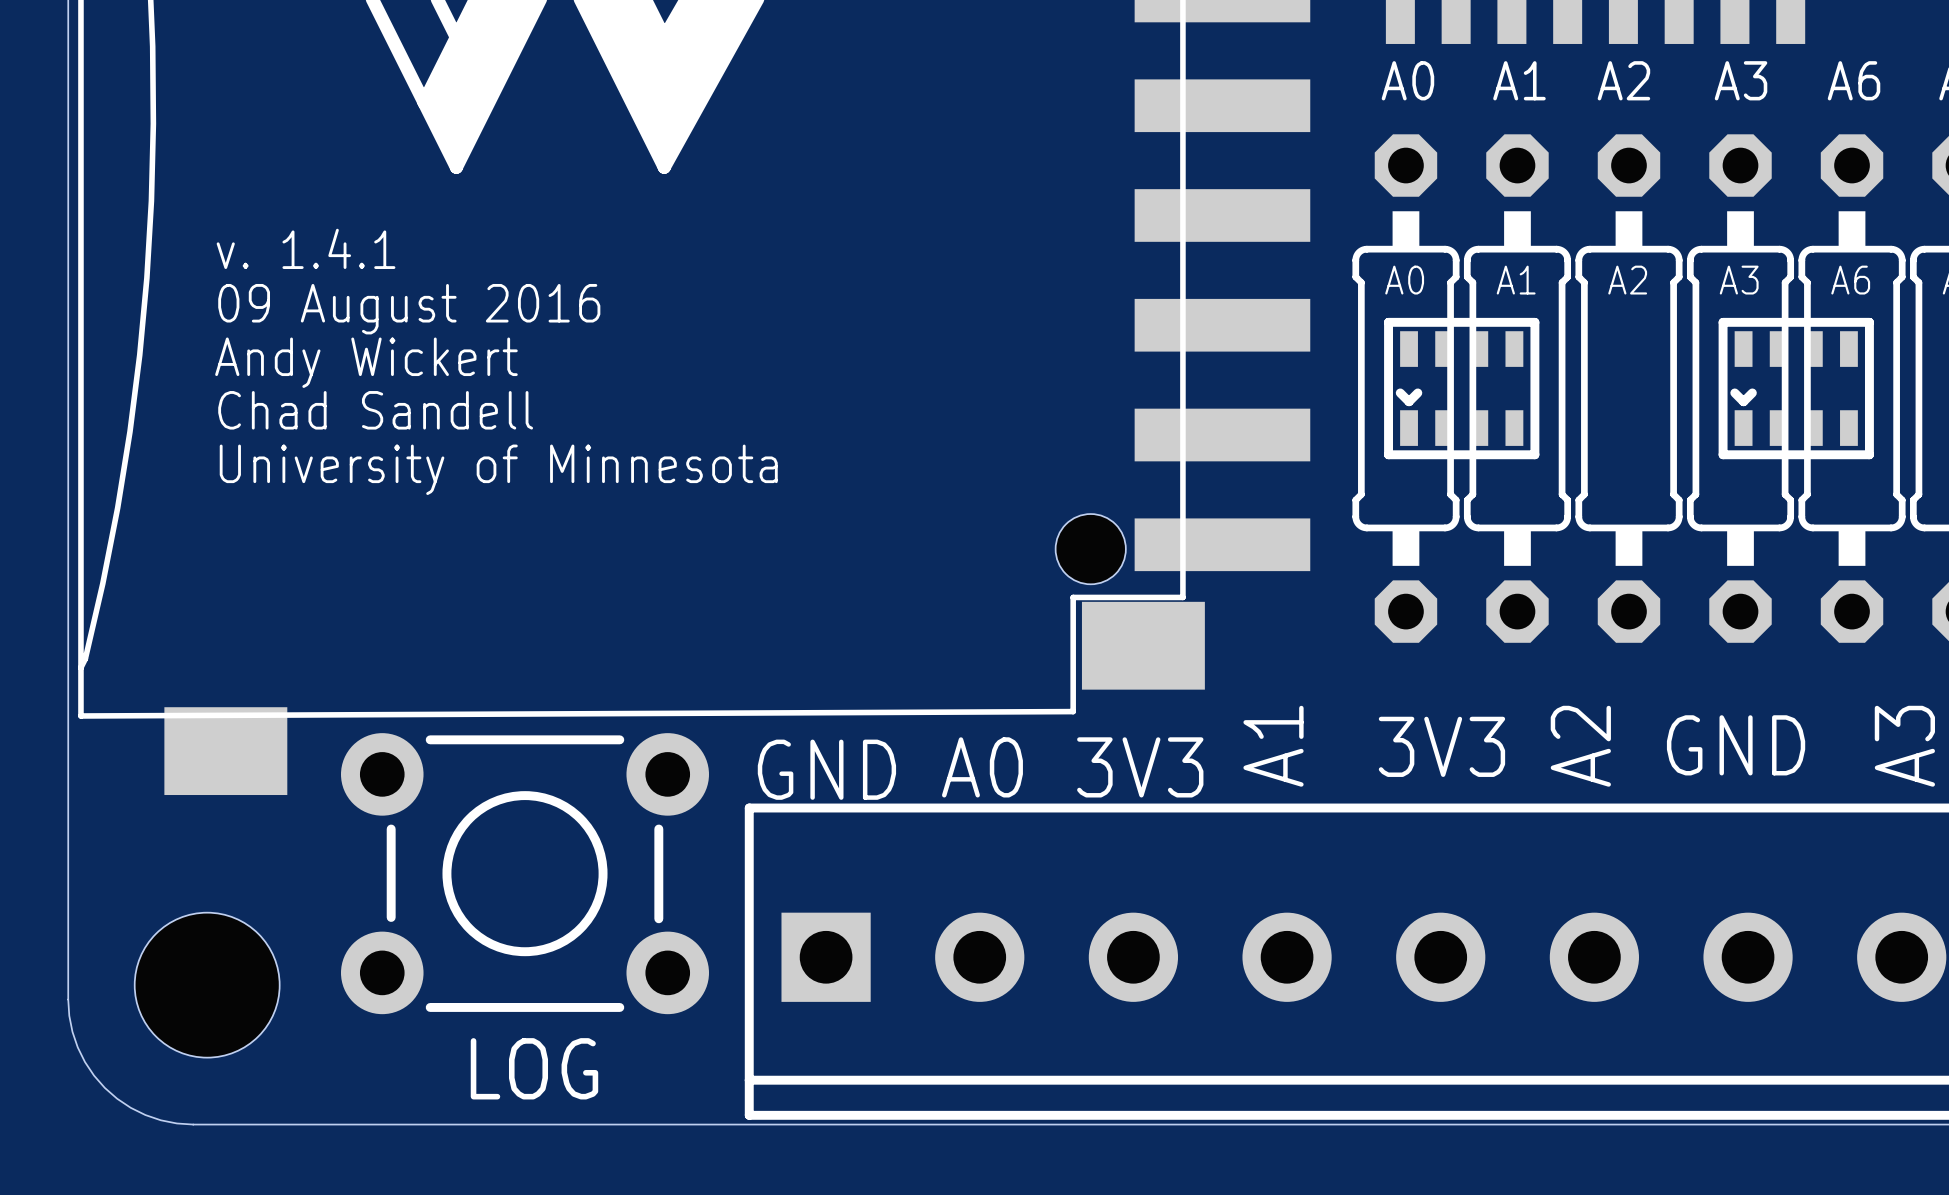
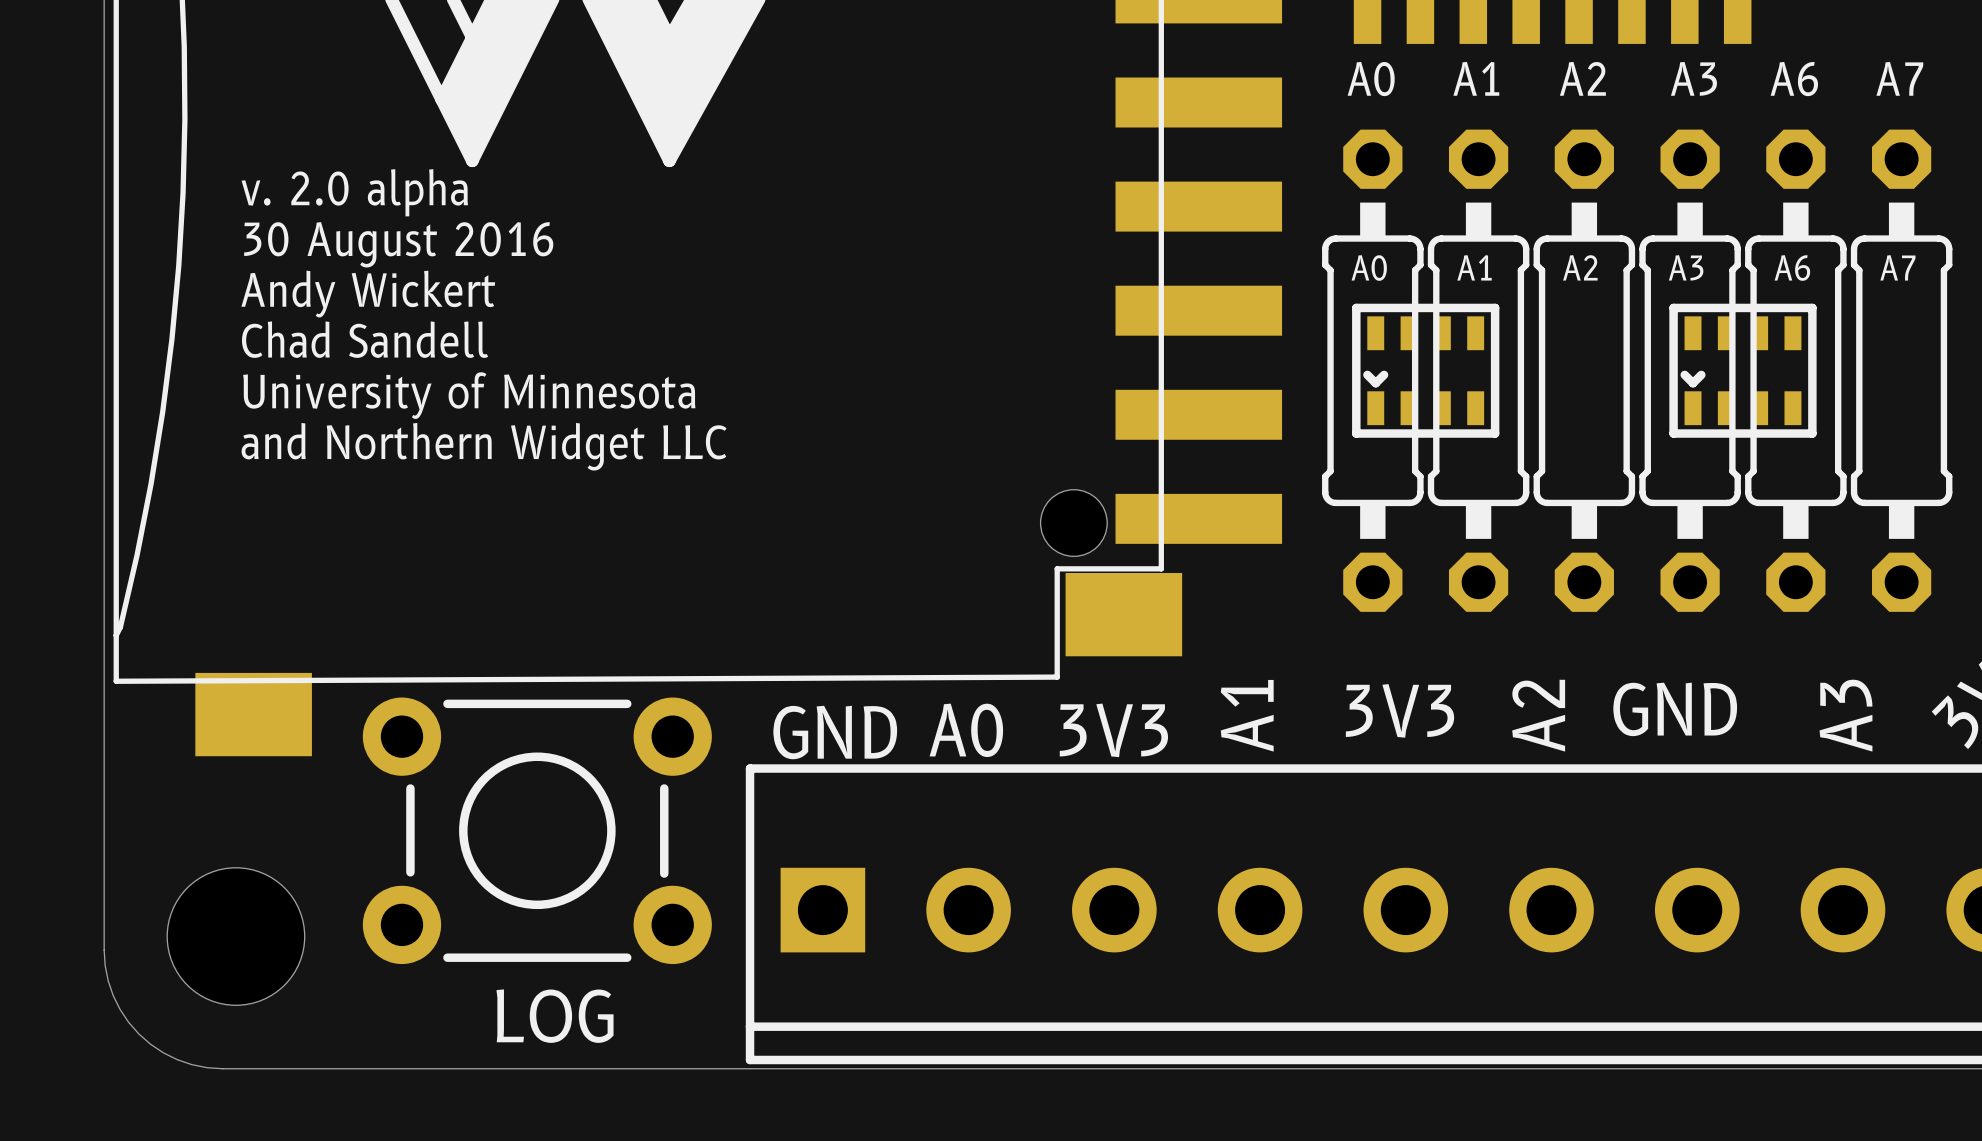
text: none -> v. 2.0 alpha (354, 192)
text: v. 1.4.1 (306, 248) -> 30 August 2016 (398, 244)
text: 09 August 2016 (409, 309) -> Andy Wickert (368, 294)
text: Andy Wickert (366, 362) -> Chad Sandell (365, 339)
text: Chad Sandell (375, 410) -> University of Minnesota (469, 395)
text: University of Minnesota (498, 469) -> and Northern Widget LLC (484, 446)

